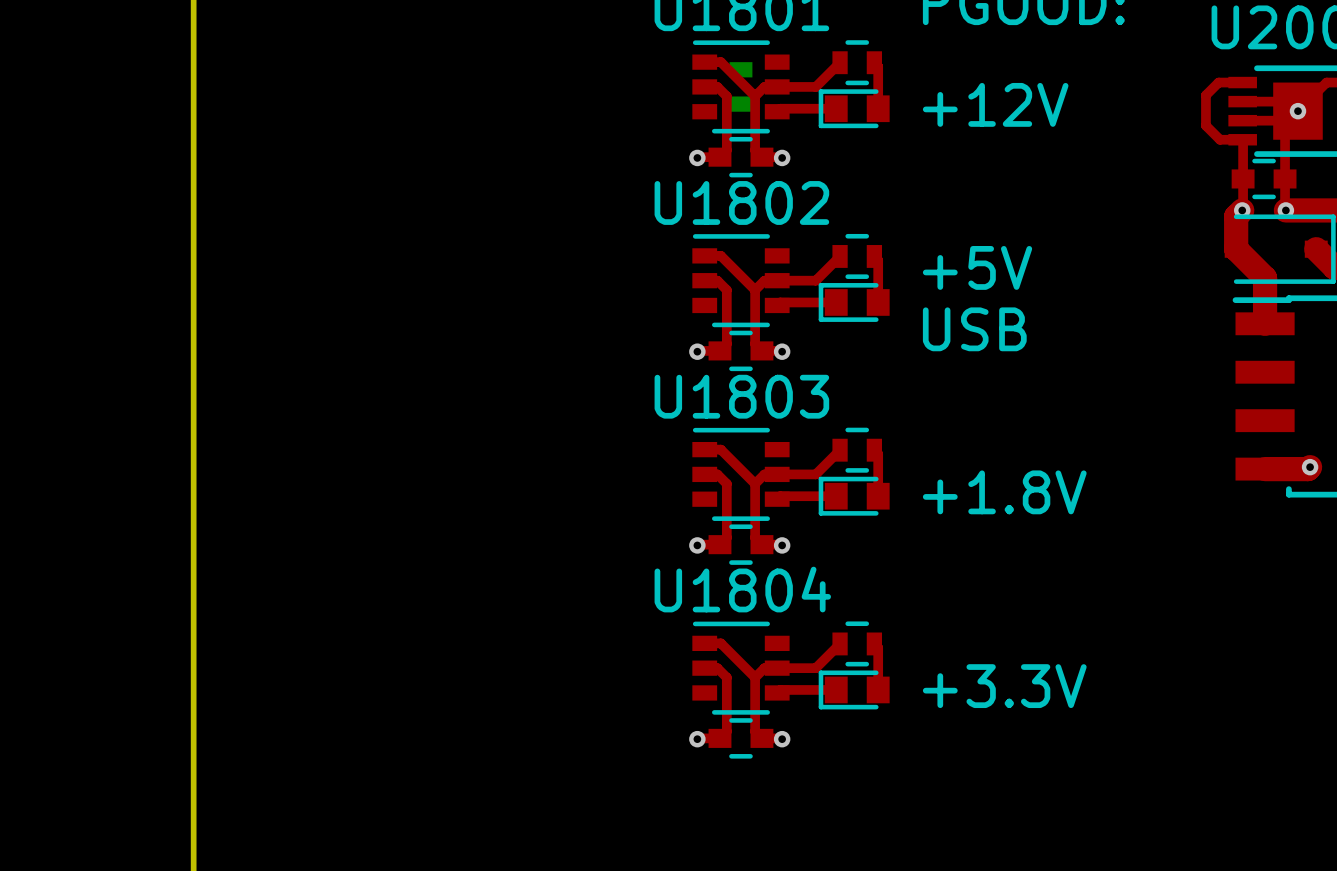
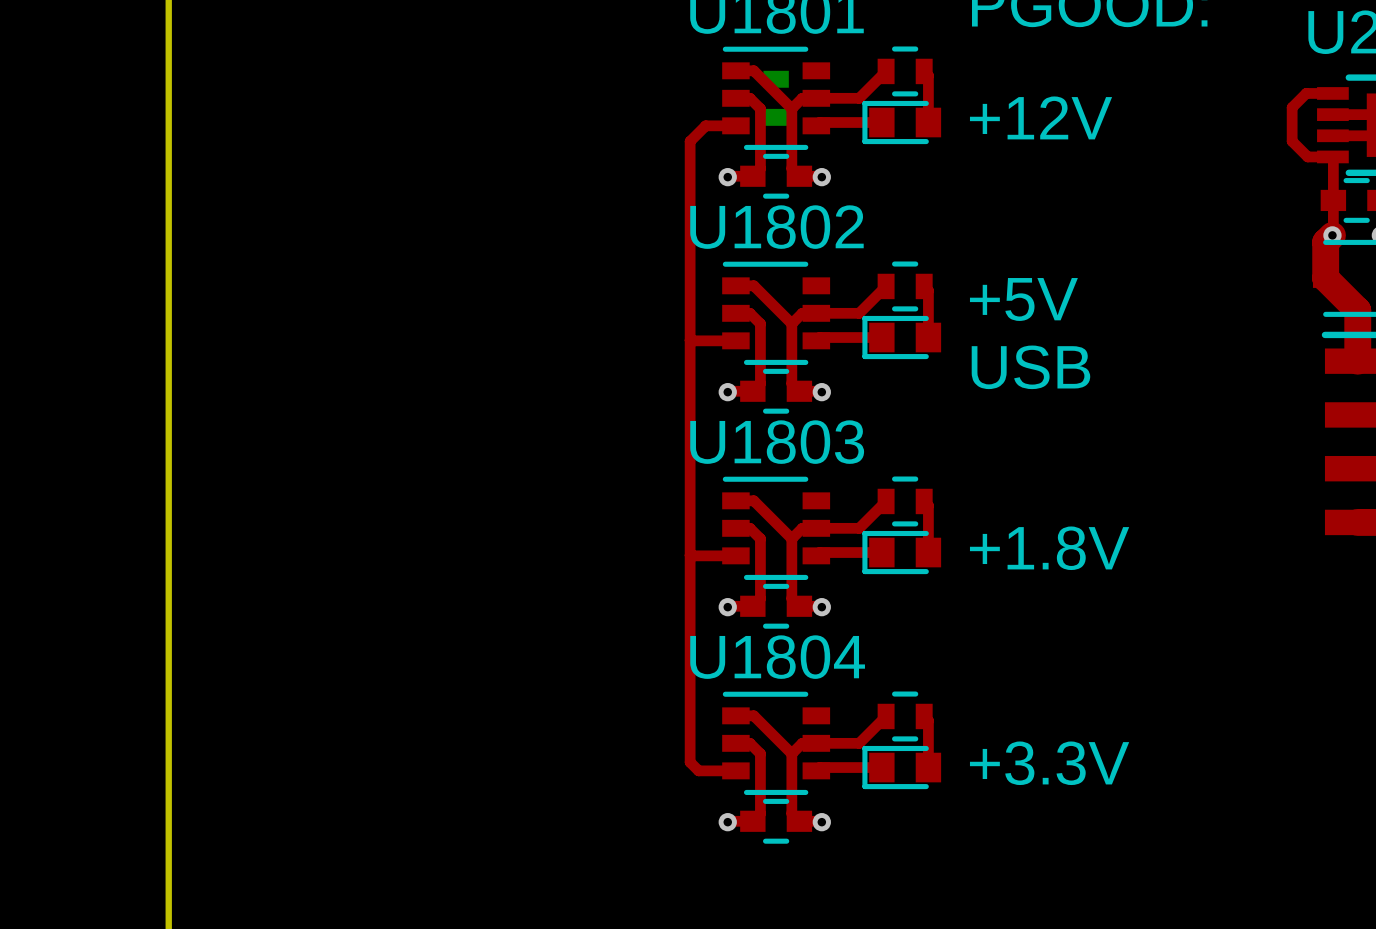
top track: none -> (735, 125) (705, 125) (690, 141) (690, 762) (698, 770) (735, 770)
top track: none -> (690, 340) (735, 340)
top track: none -> (690, 555) (735, 555)

